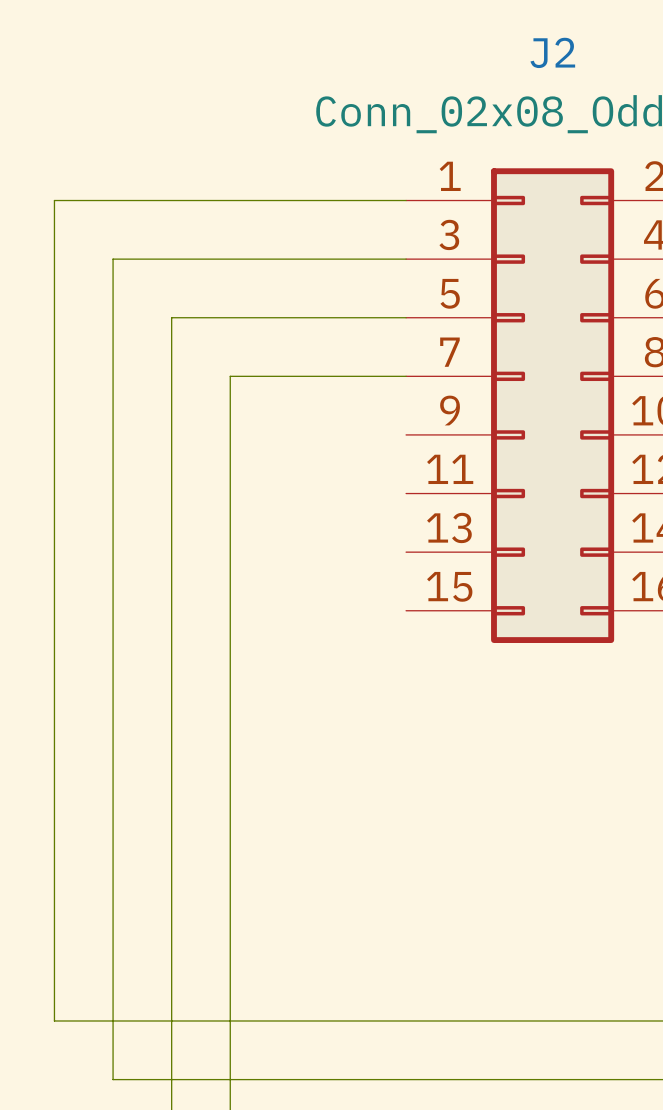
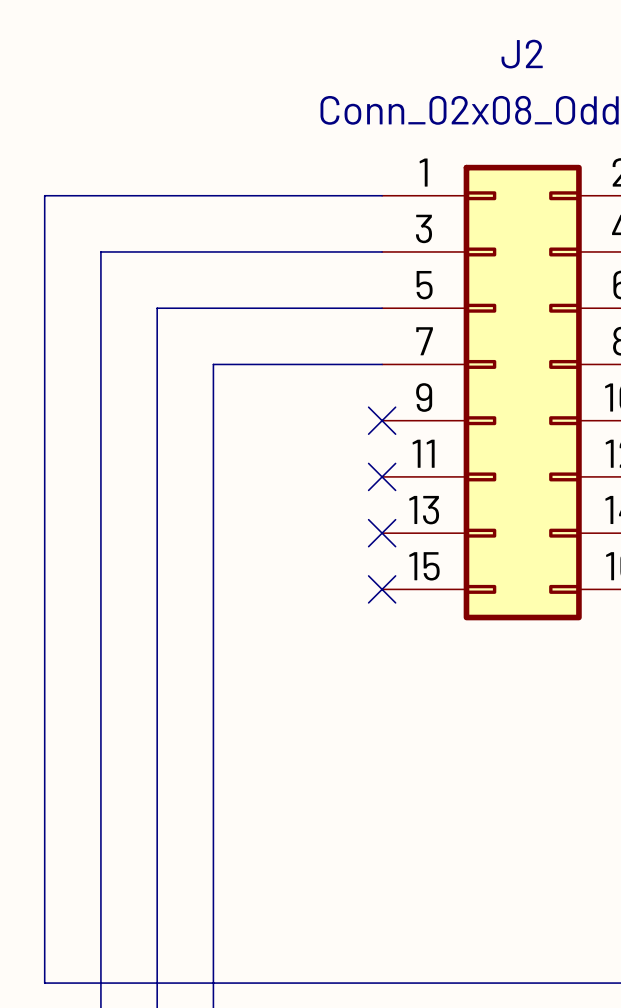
no-connect mark: none -> (382, 420)
no-connect mark: none -> (382, 476)
no-connect mark: none -> (382, 533)
no-connect mark: none -> (382, 589)

